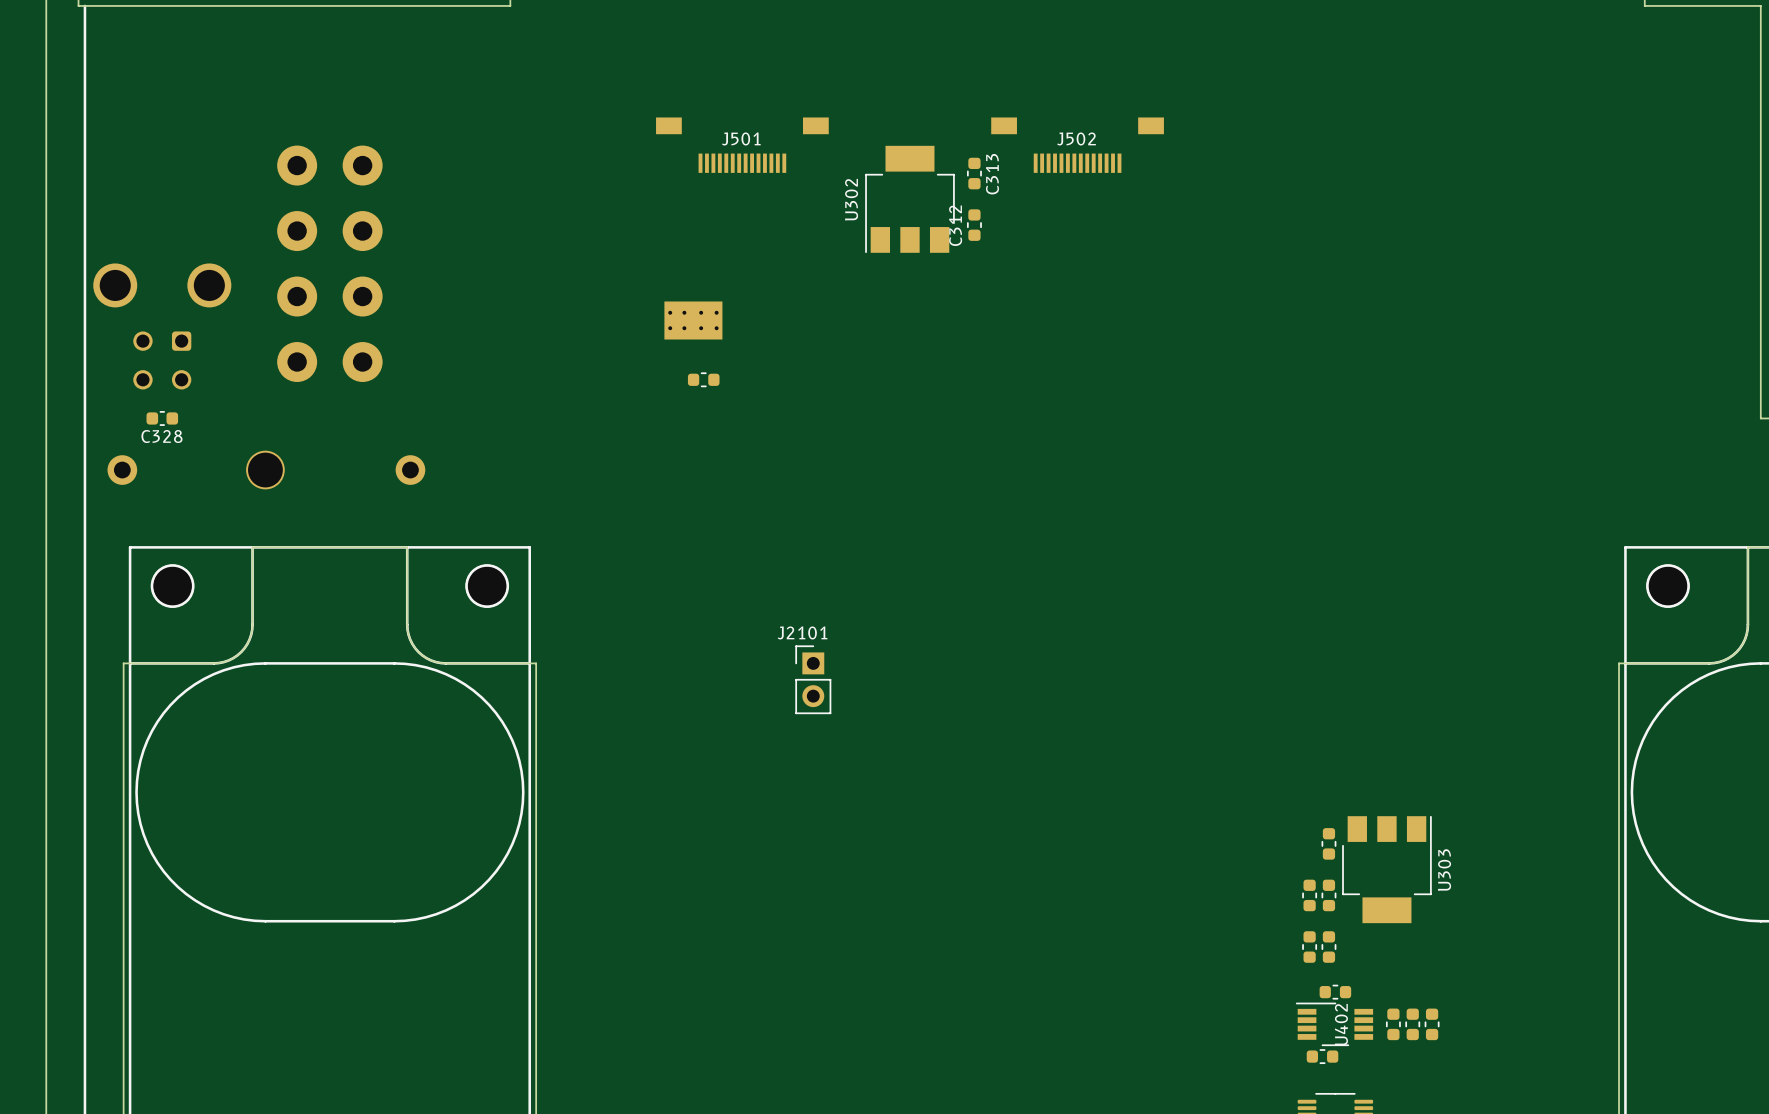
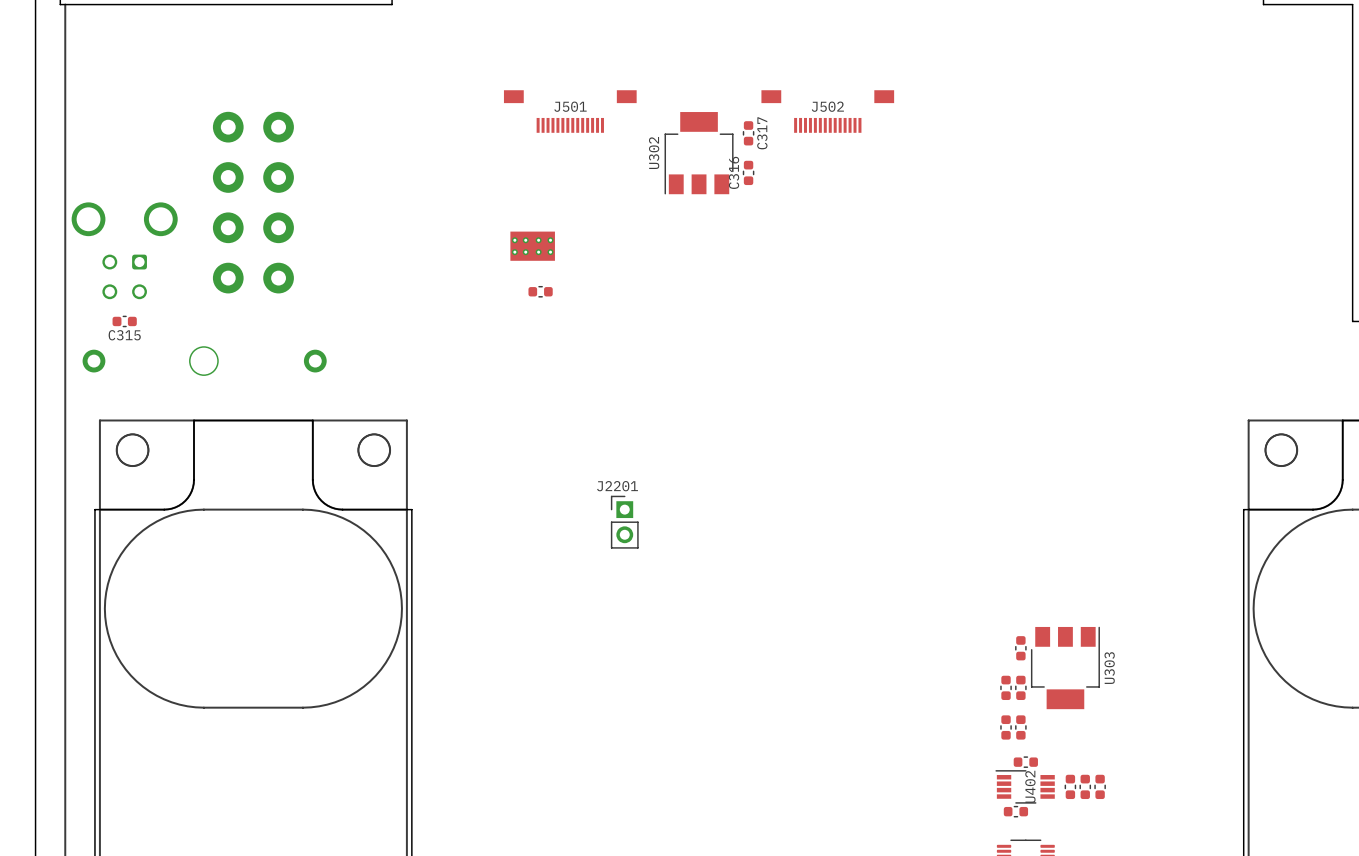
C313 name: C313 (992, 174) -> C317 (762, 133)
C312 name: C312 (955, 225) -> C316 (734, 172)
C328 name: C328 (161, 436) -> C315 (124, 335)
J2101 name: J2101 (802, 632) -> J2201 (617, 486)

